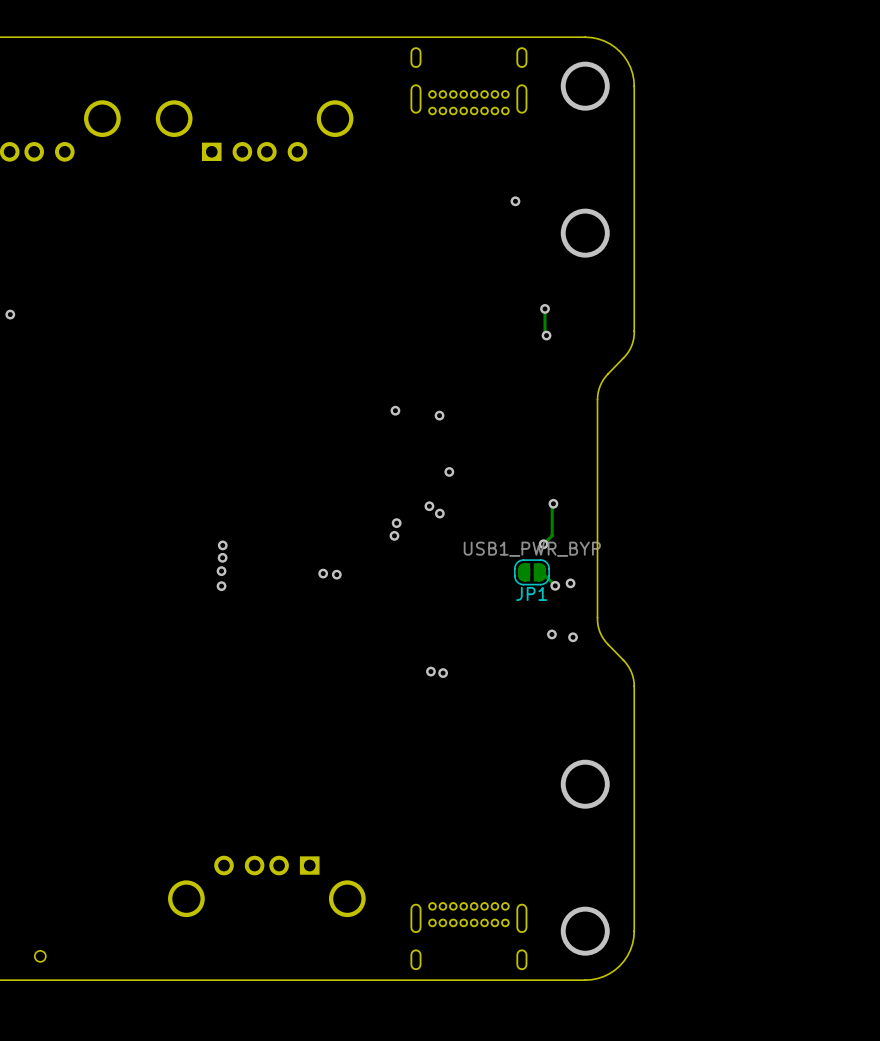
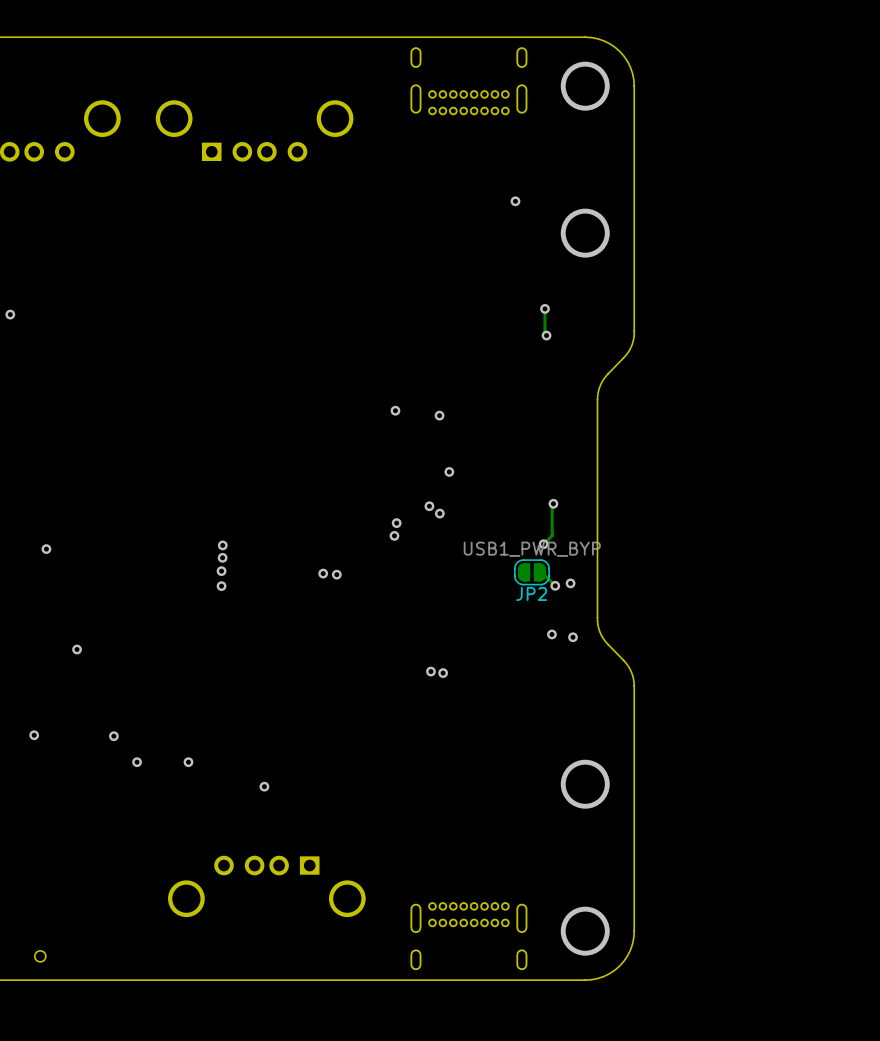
via: none -> (46, 549)
JP1 name: JP1 (531, 593) -> JP2 (531, 593)
via: none -> (77, 649)
via: none -> (34, 735)
via: none -> (113, 736)
via: none -> (137, 762)
via: none -> (188, 762)
via: none -> (264, 786)

